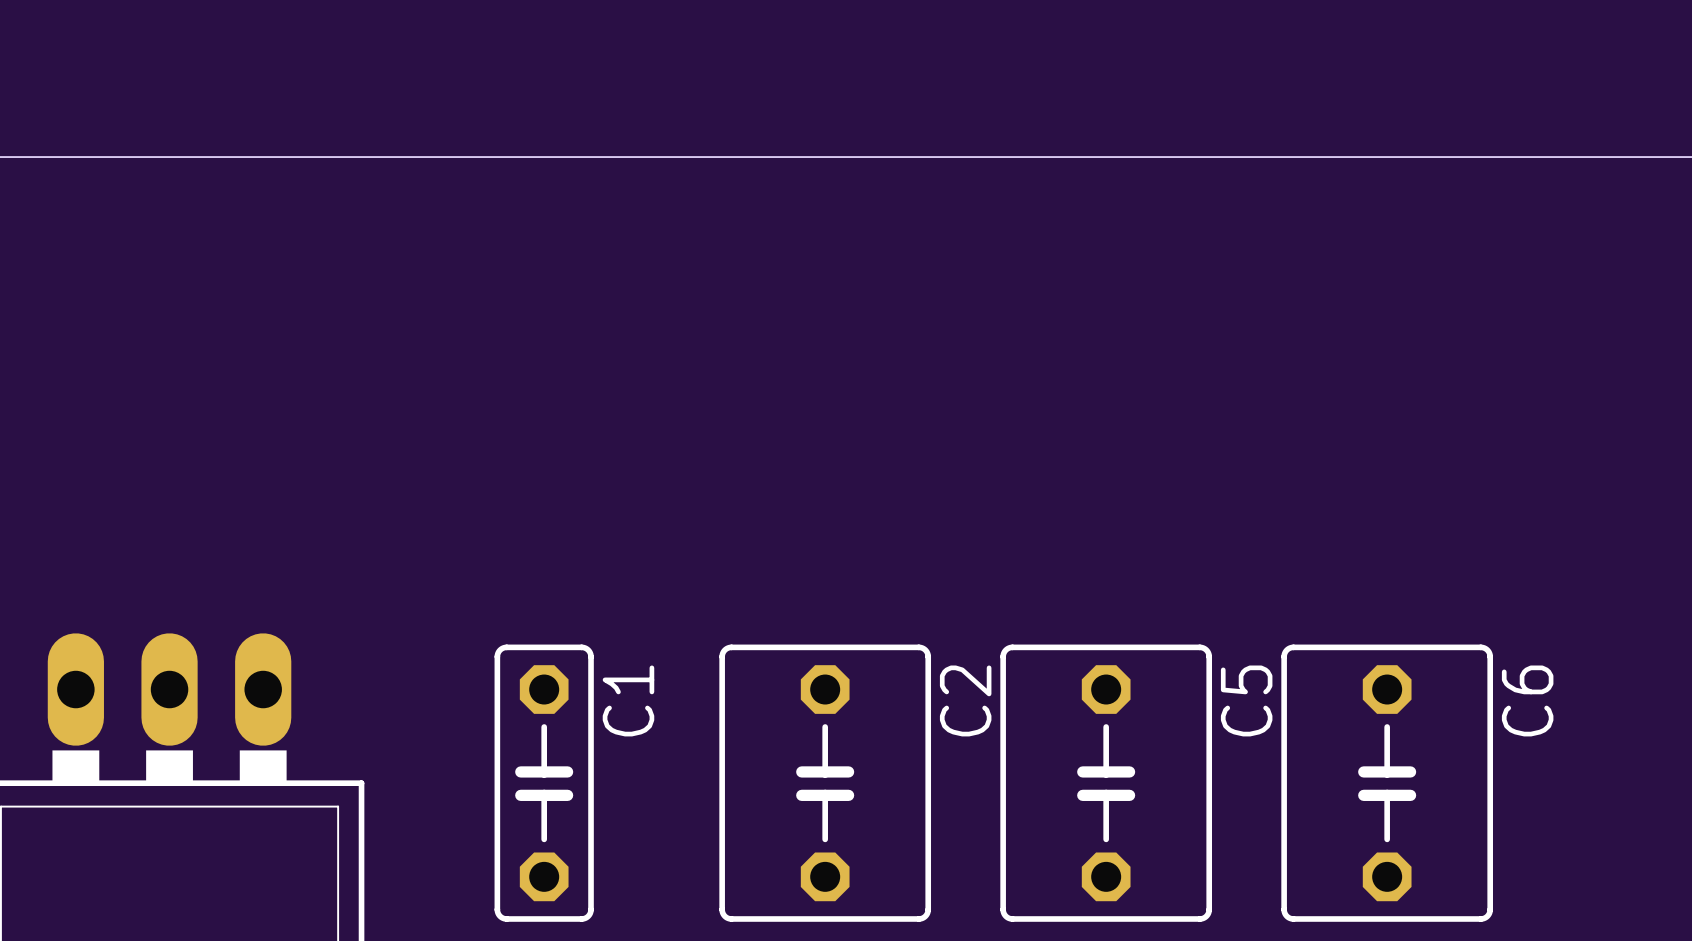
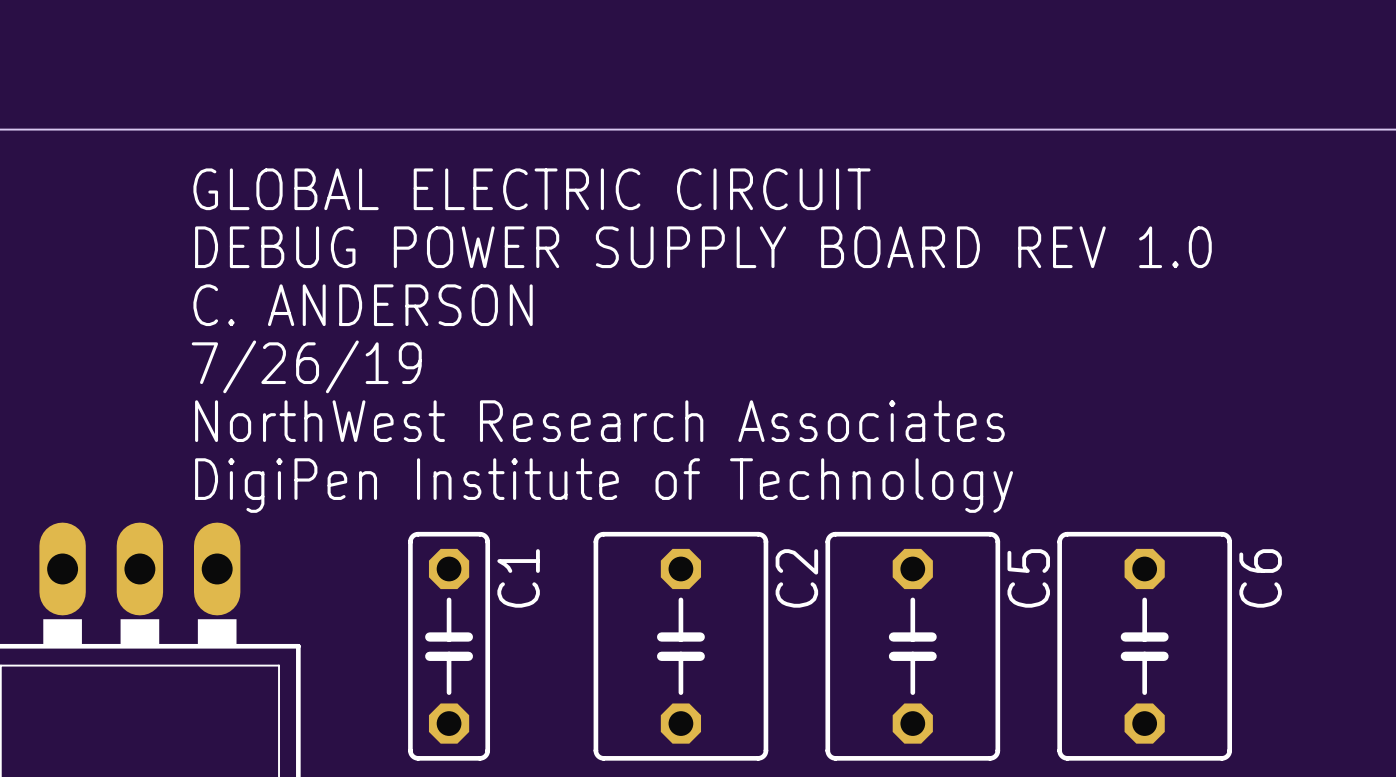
text: none -> GLOBAL ELECTRIC CIRCUIT (532, 189)
text: none -> DEBUG POWER SUPPLY BOARD REV 1.0 (703, 247)
text: none -> C. ANDERSON (363, 305)
text: none -> 7/26/19 (306, 366)
text: none -> NorthWest Research Associates (599, 421)
text: none -> DigiPen Institute of Technology (604, 485)

